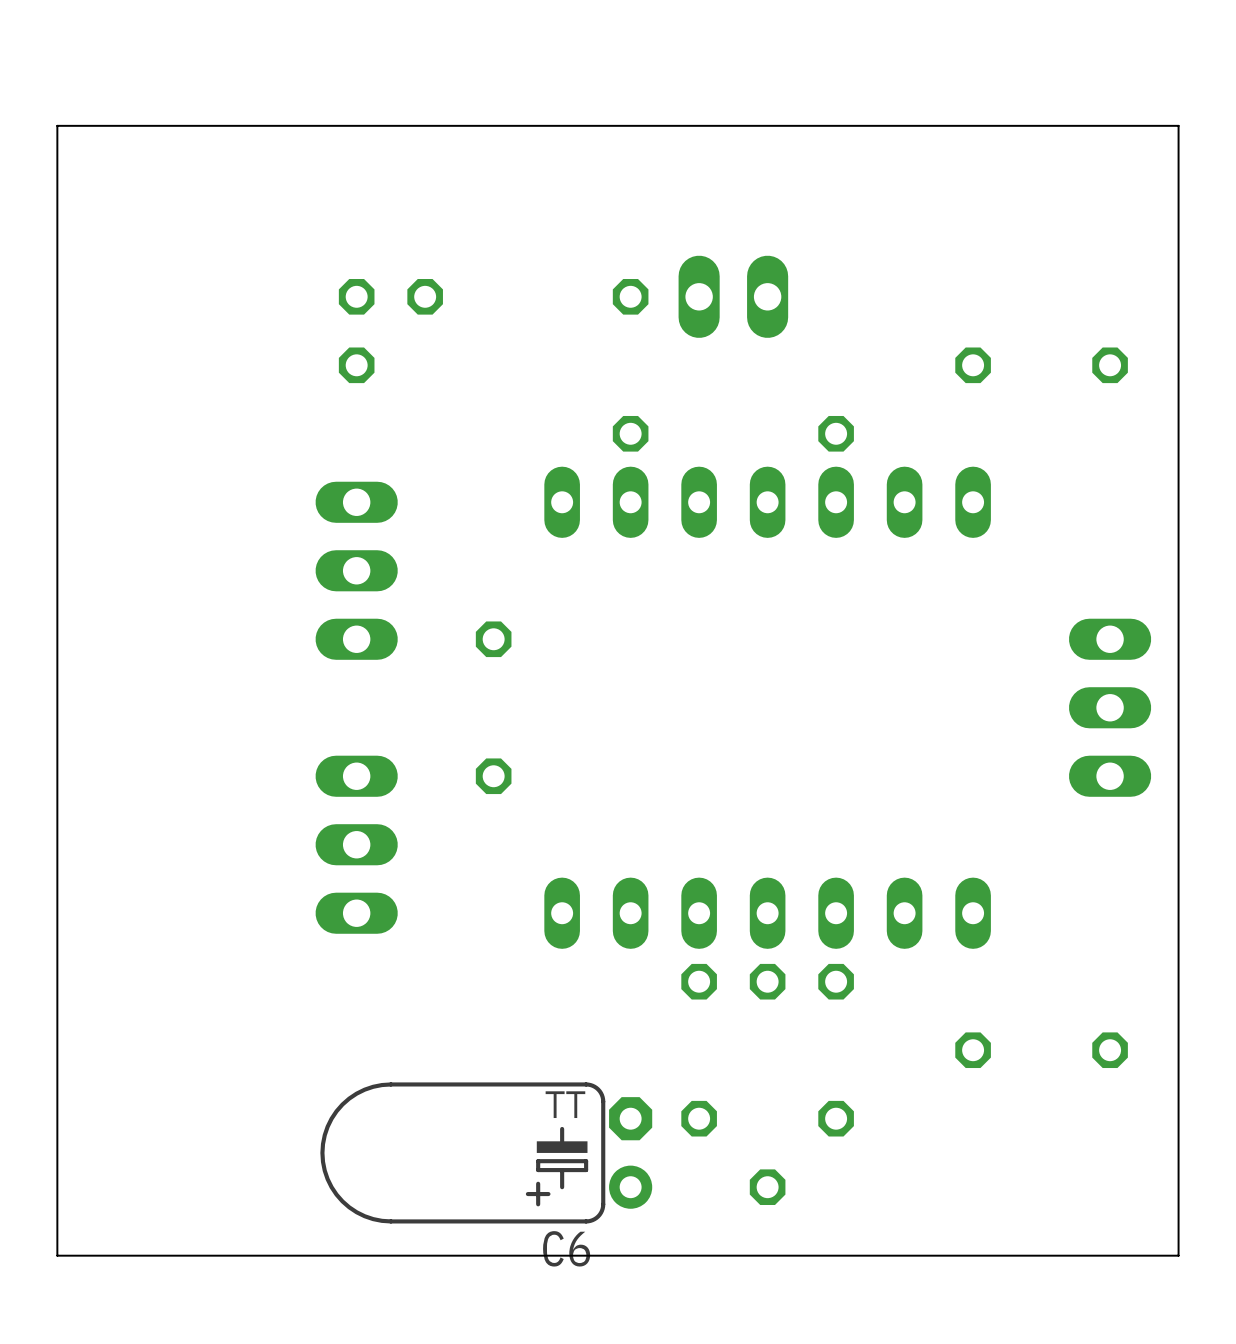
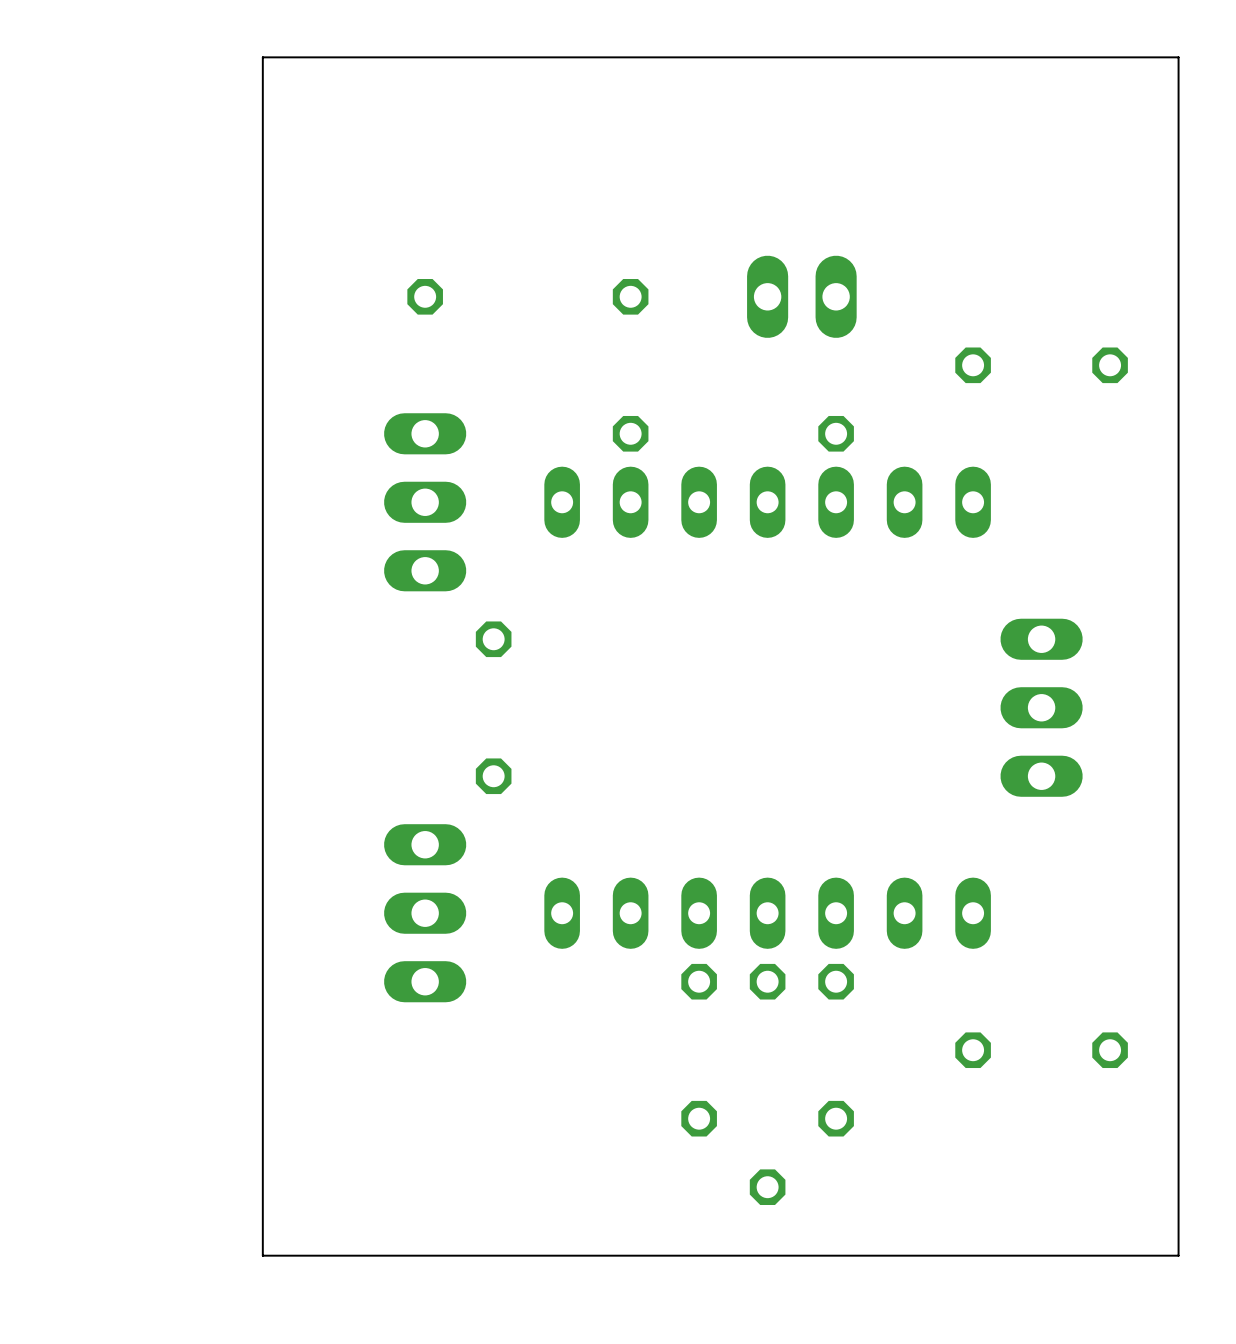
board edge: (1178, 125) (57, 125) (57, 1255) (262, 1255) -> (1178, 125) (1178, 57) (262, 57) (262, 1255)
part position: (733, 296) -> (801, 296)
part: (356, 331) -> none
part position: (356, 570) -> (425, 502)
part position: (1110, 707) -> (1041, 707)
part position: (356, 844) -> (425, 913)
C6: (486, 1152) -> none

